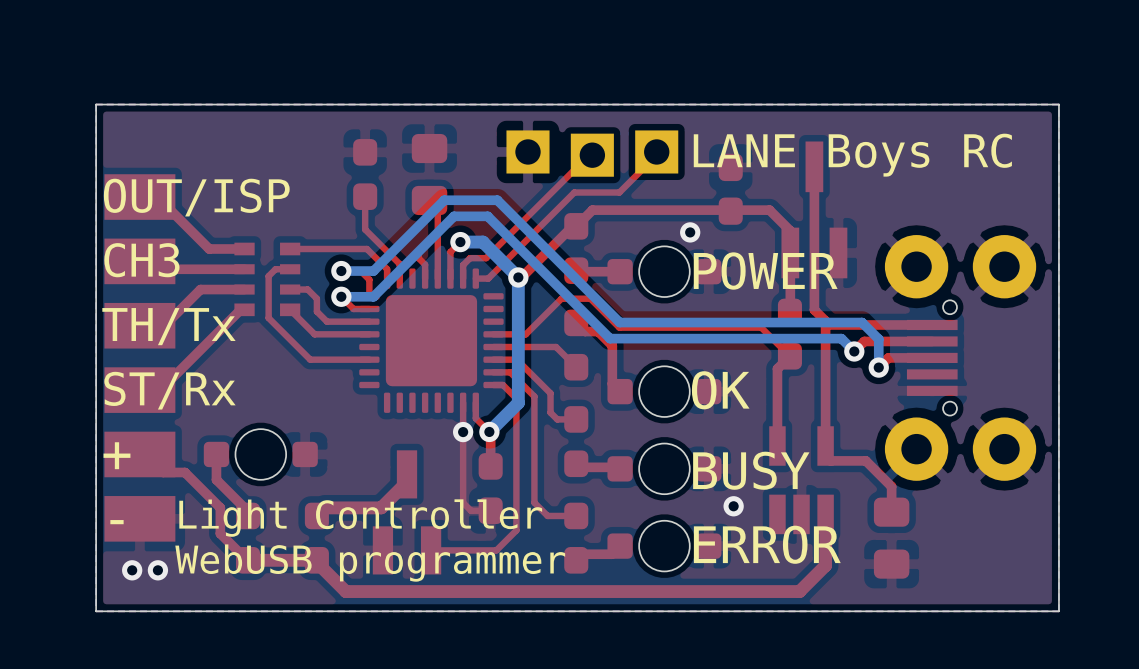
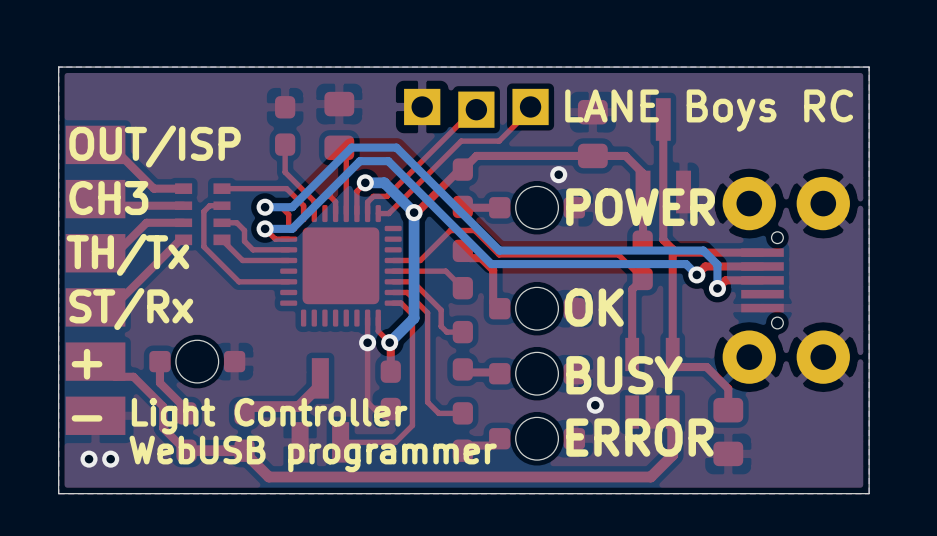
part footprint: [718, 153, 743, 225] -> [577, 99, 608, 169]

